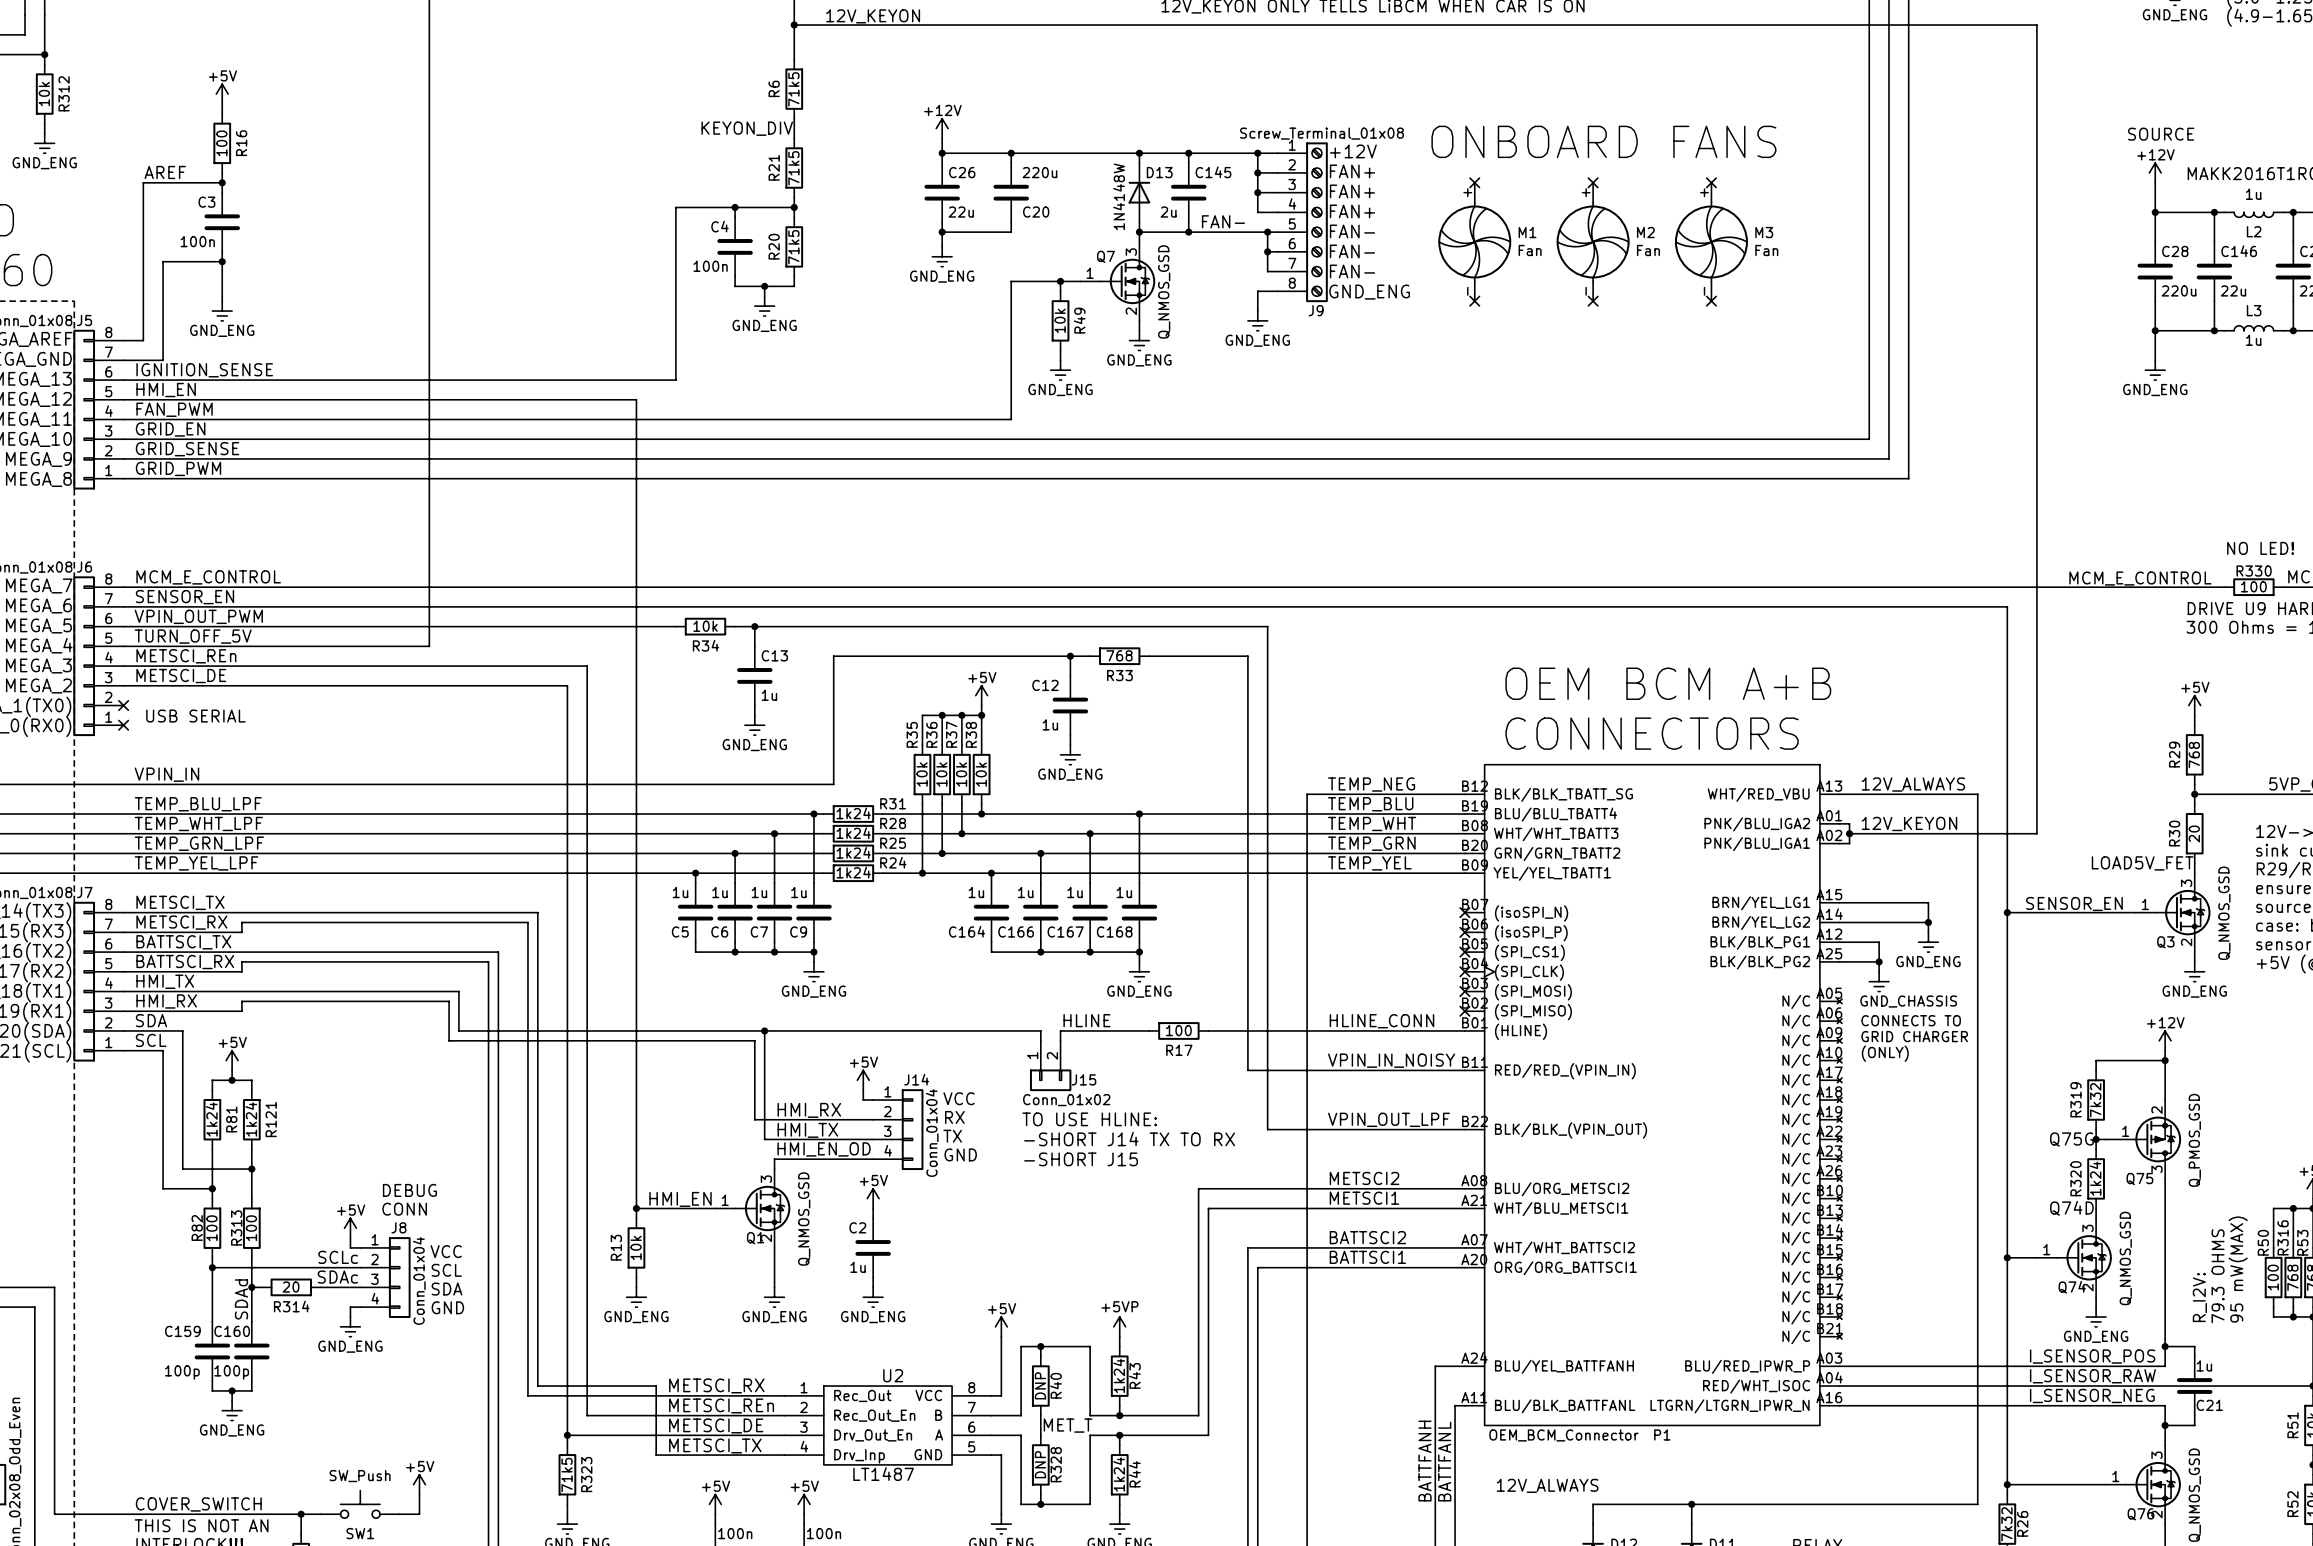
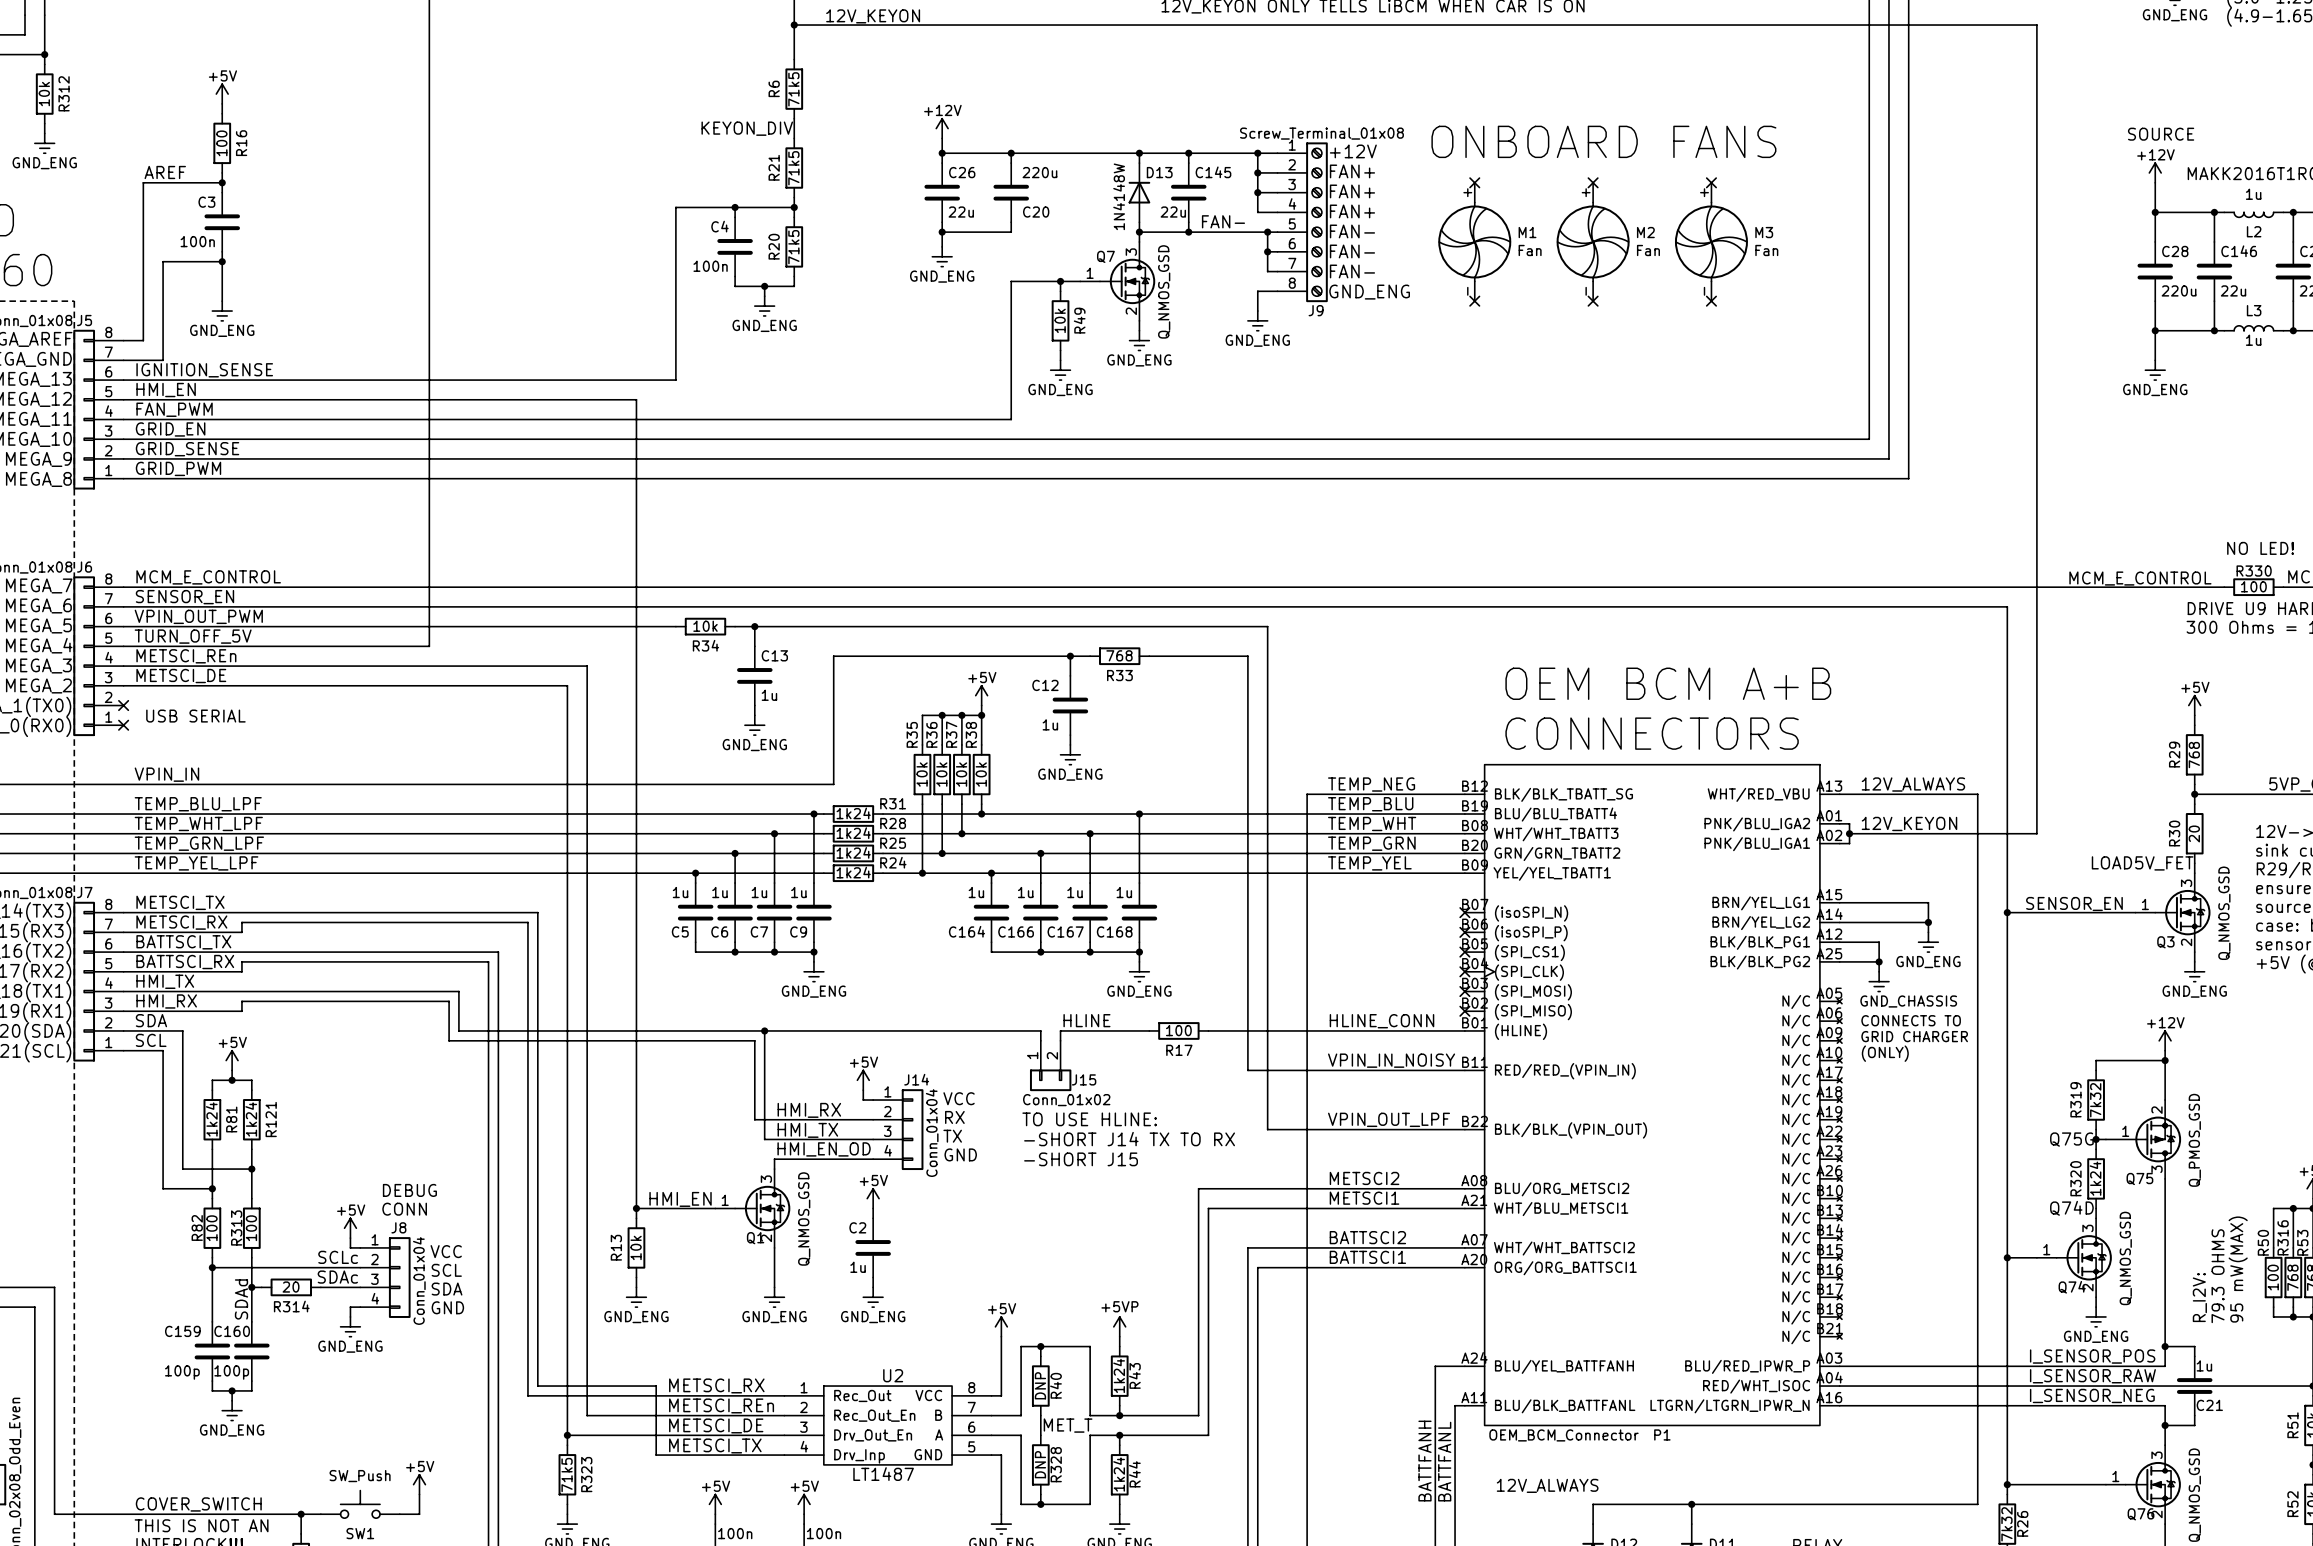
C145 value: 2u (1168, 212) -> 22u (1173, 212)

